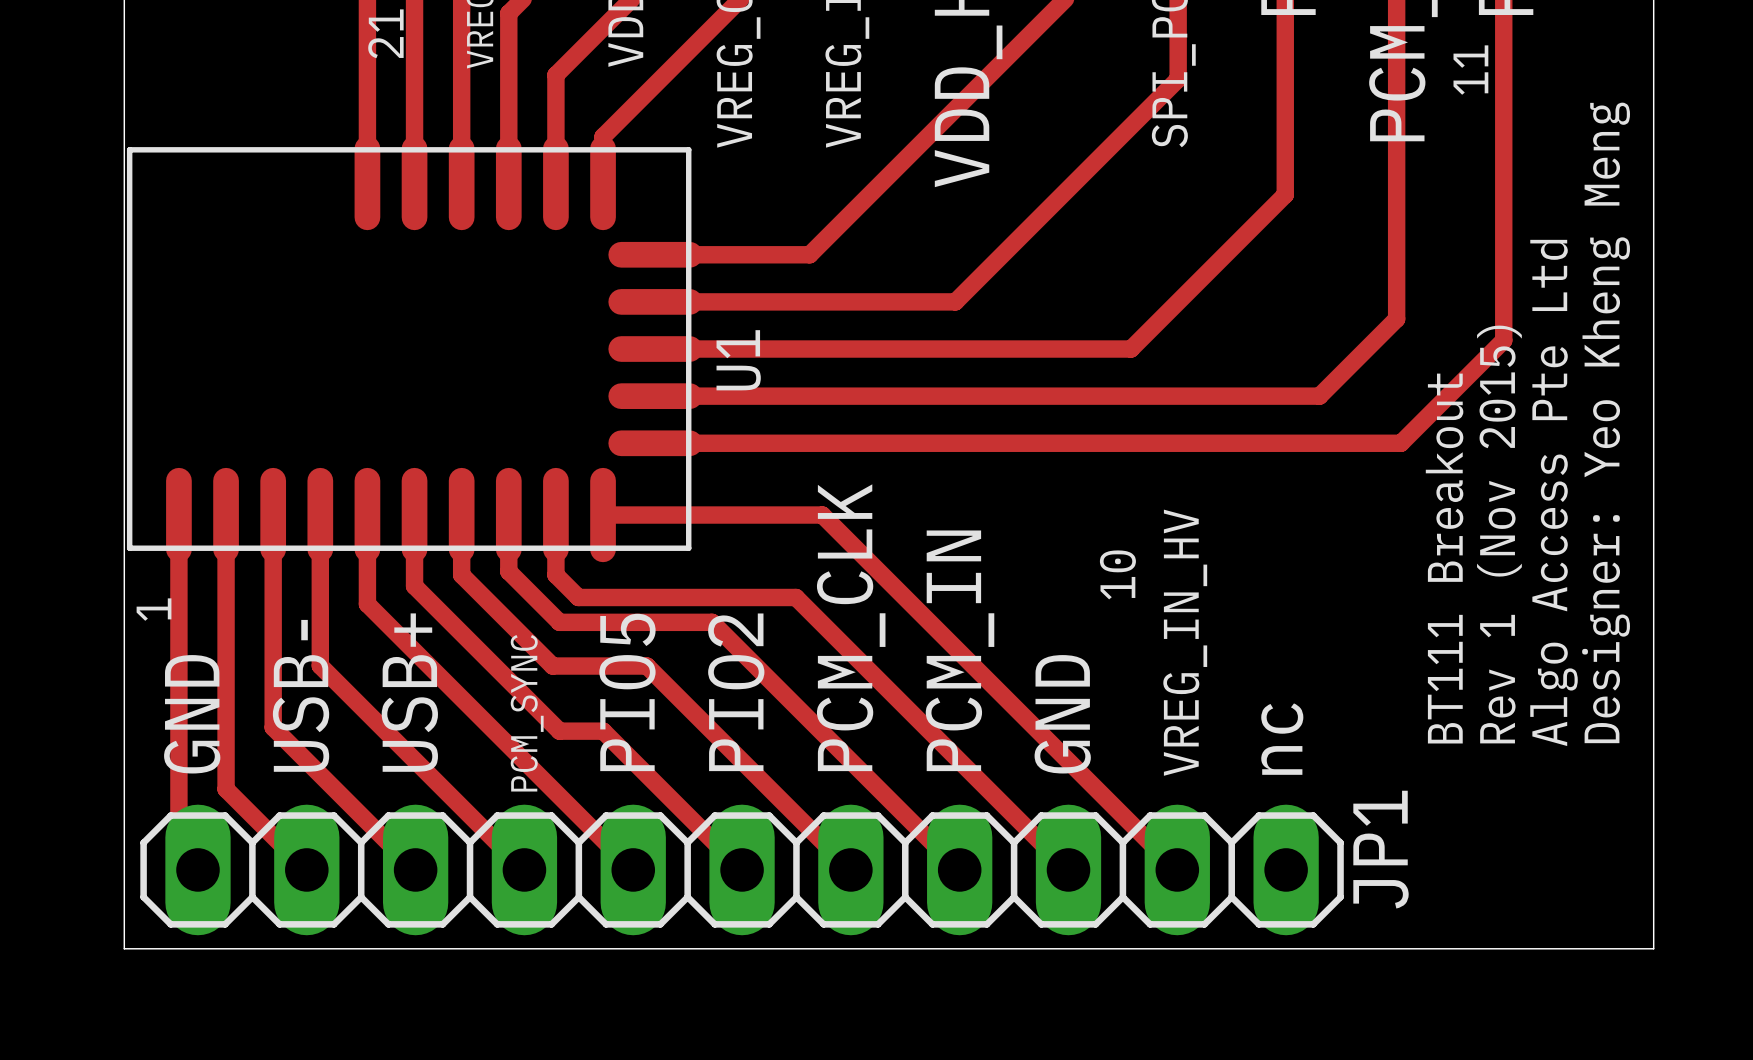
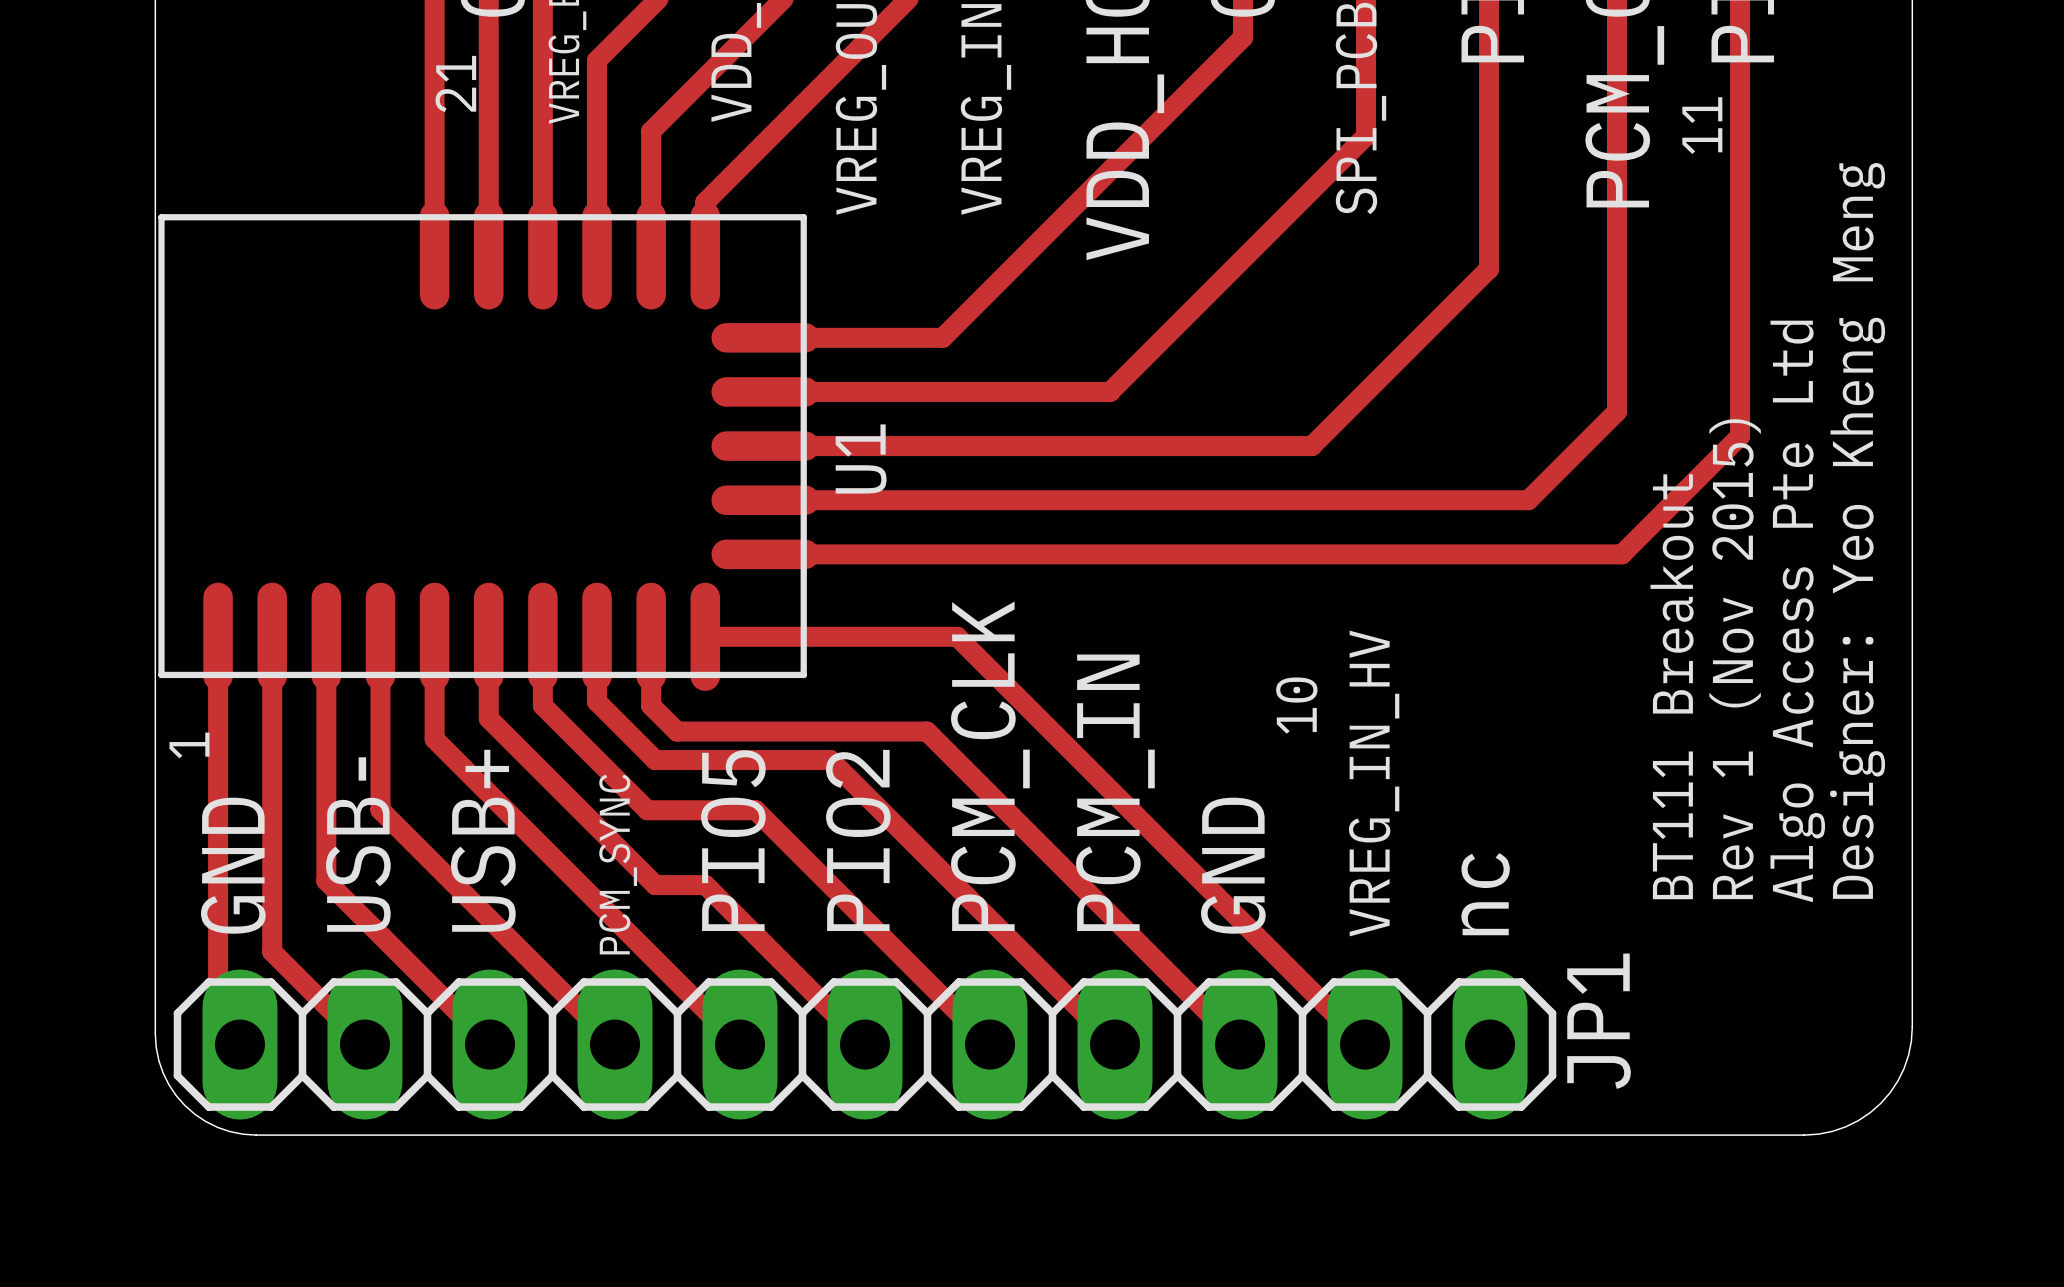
board edge: (1653, 854) (1653, 948) (1559, 948) -> (1912, 1027) (1908, 1055) (1904, 1068) (1897, 1081) (1880, 1103) (1858, 1120) (1845, 1126) (1832, 1131) (1804, 1135)
board edge: (124, 860) (124, 948) (212, 948) -> (155, 1034) (158, 1060) (163, 1072) (168, 1084) (184, 1105) (205, 1121) (217, 1127) (230, 1131) (256, 1135)

